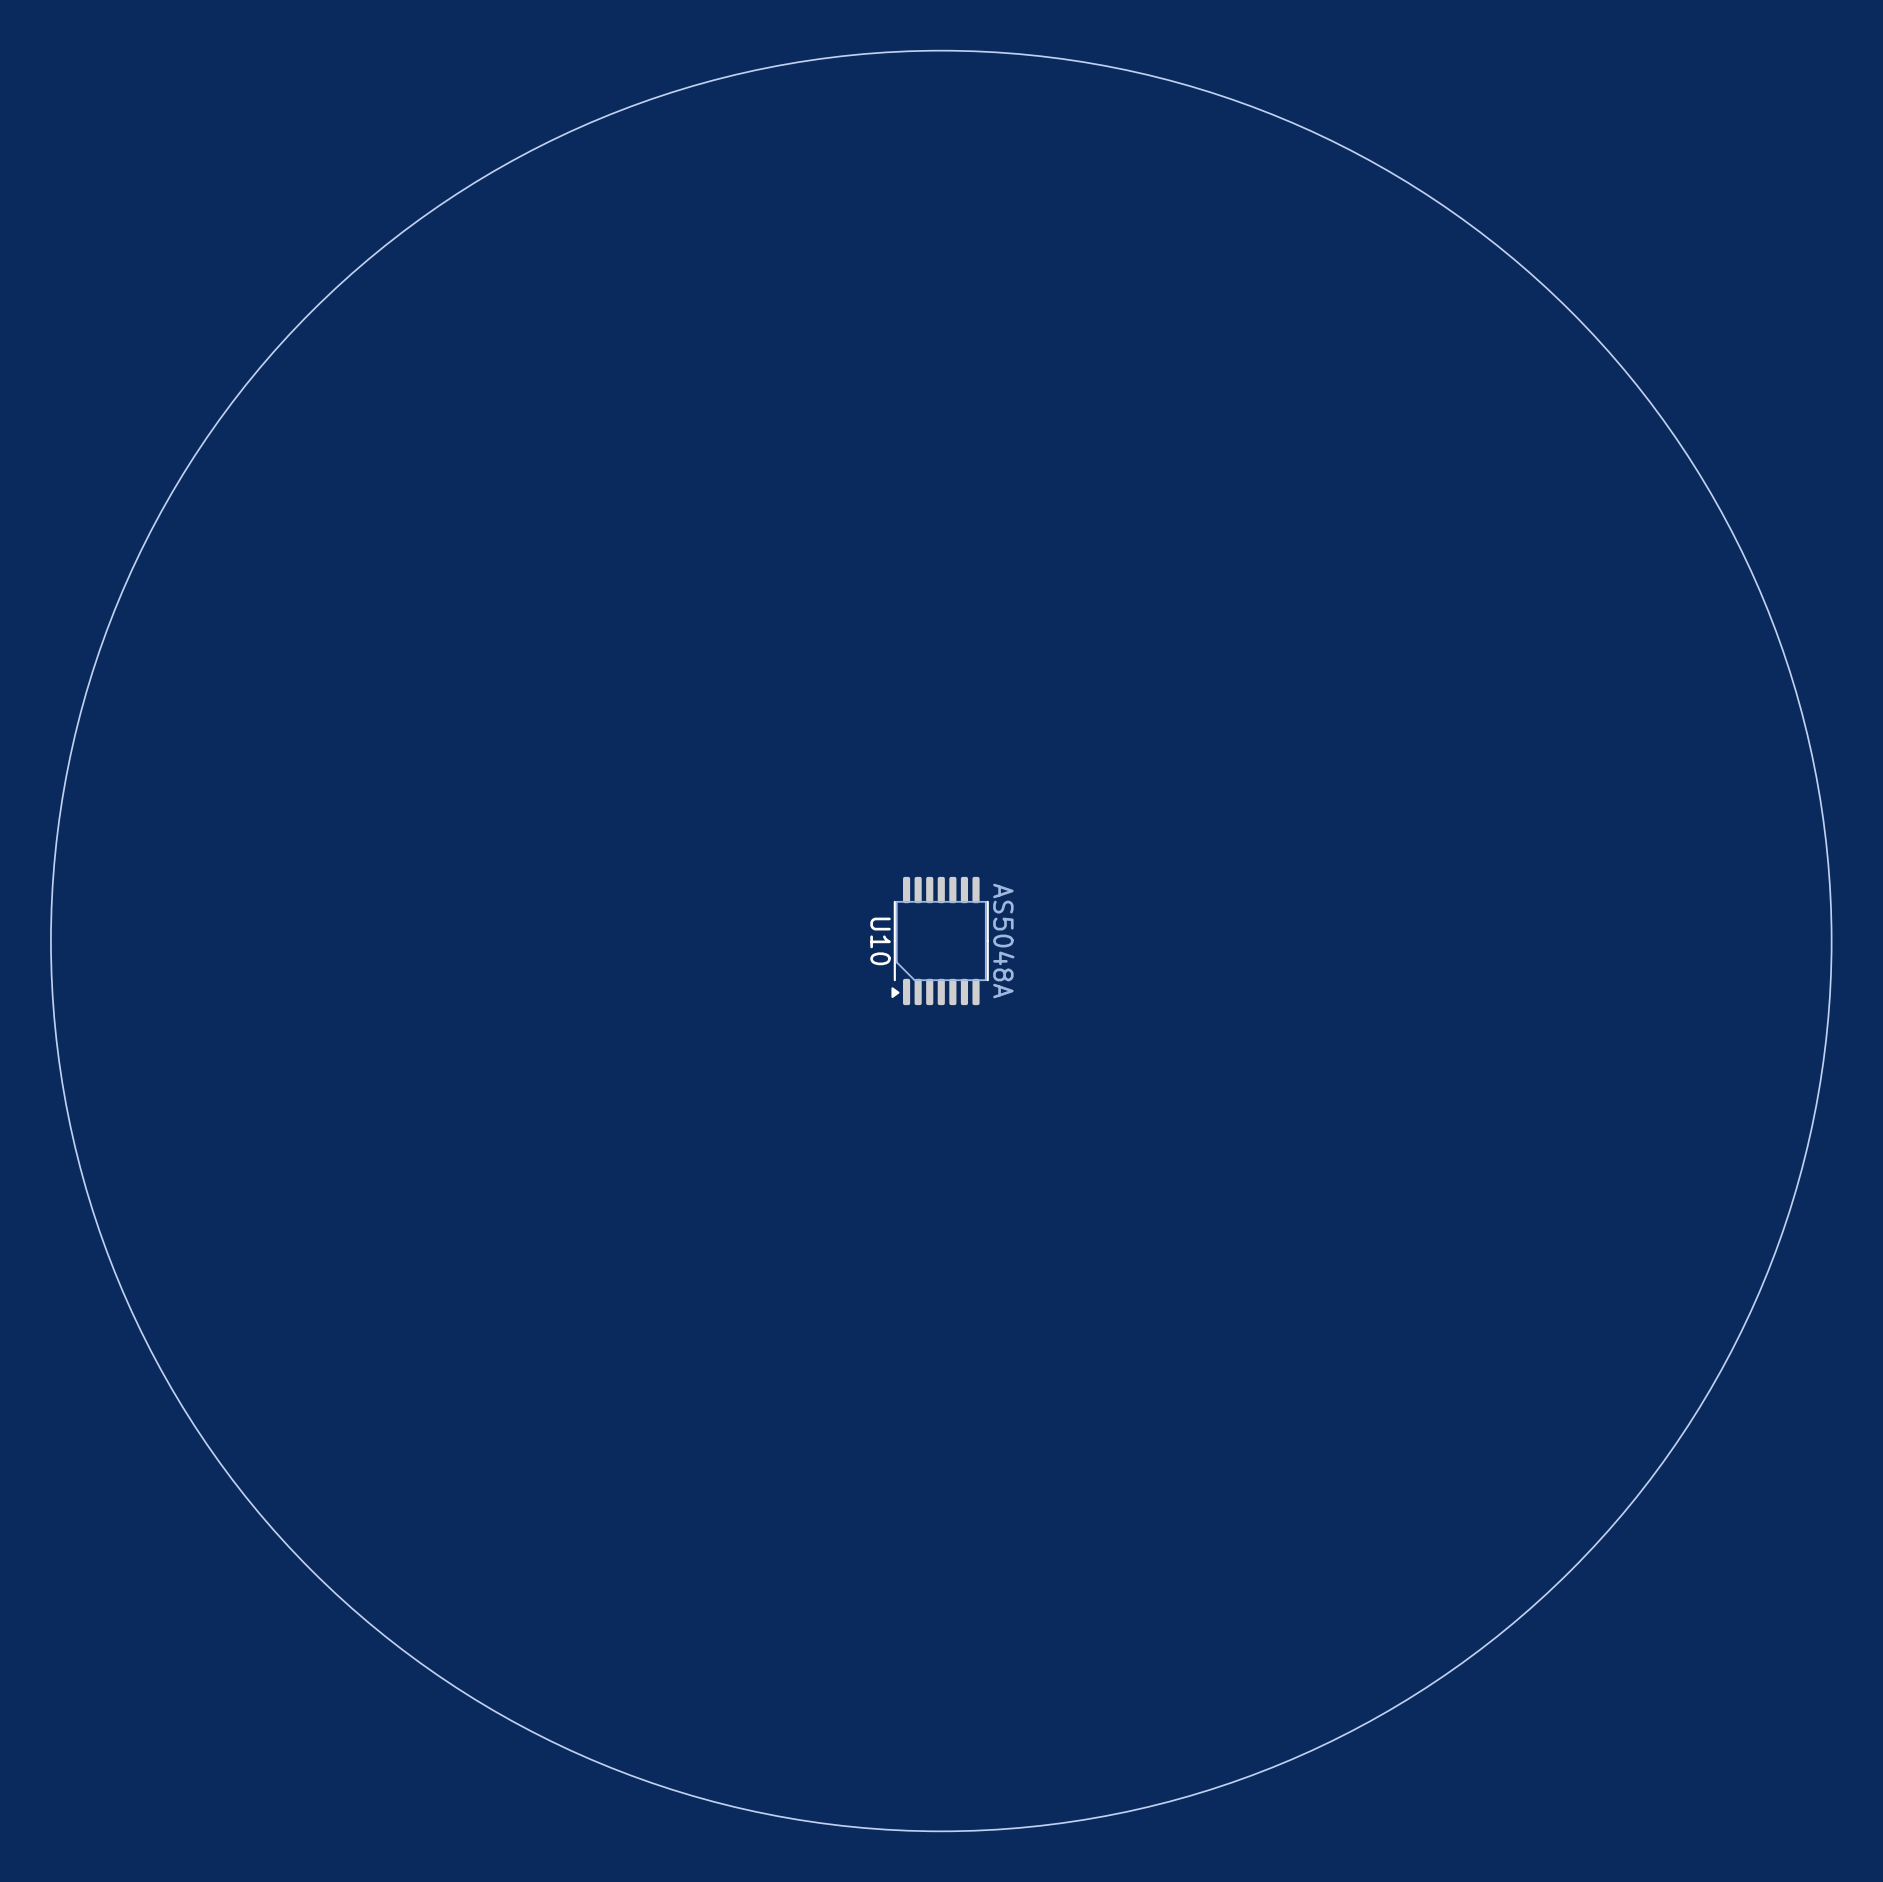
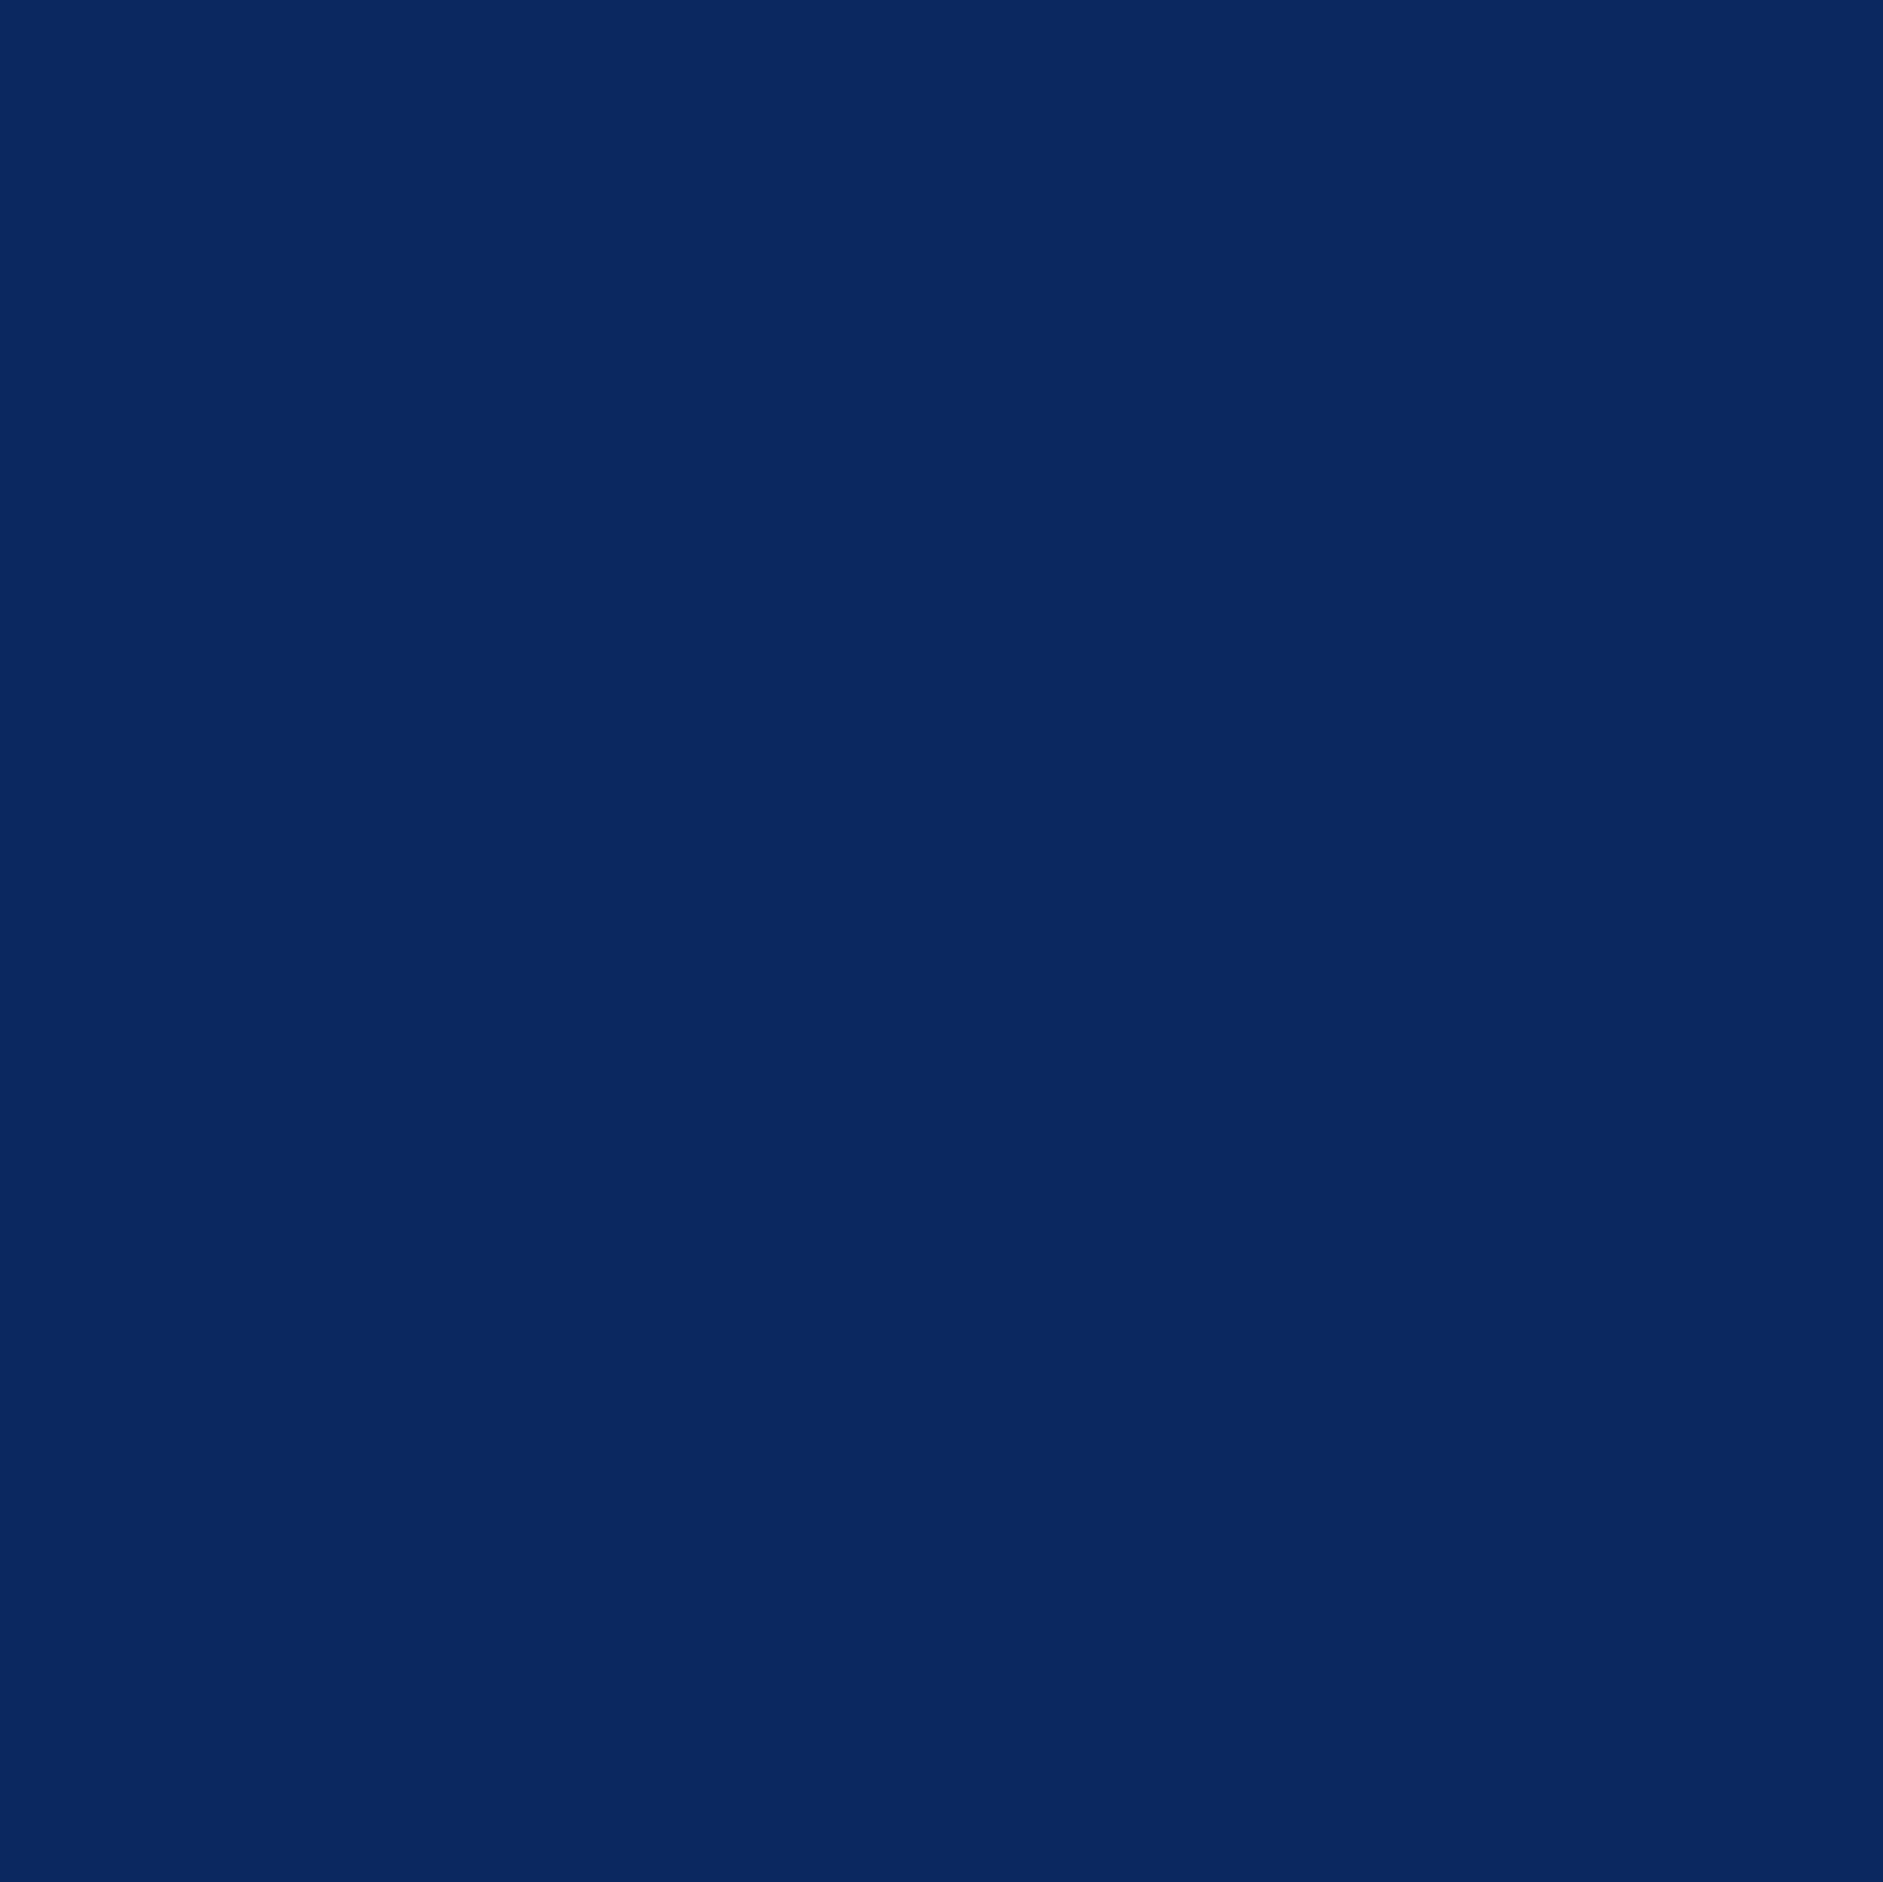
round board edge: [50, 50, 1833, 1832] -> none
U10: AS5048A (940, 941) -> none

